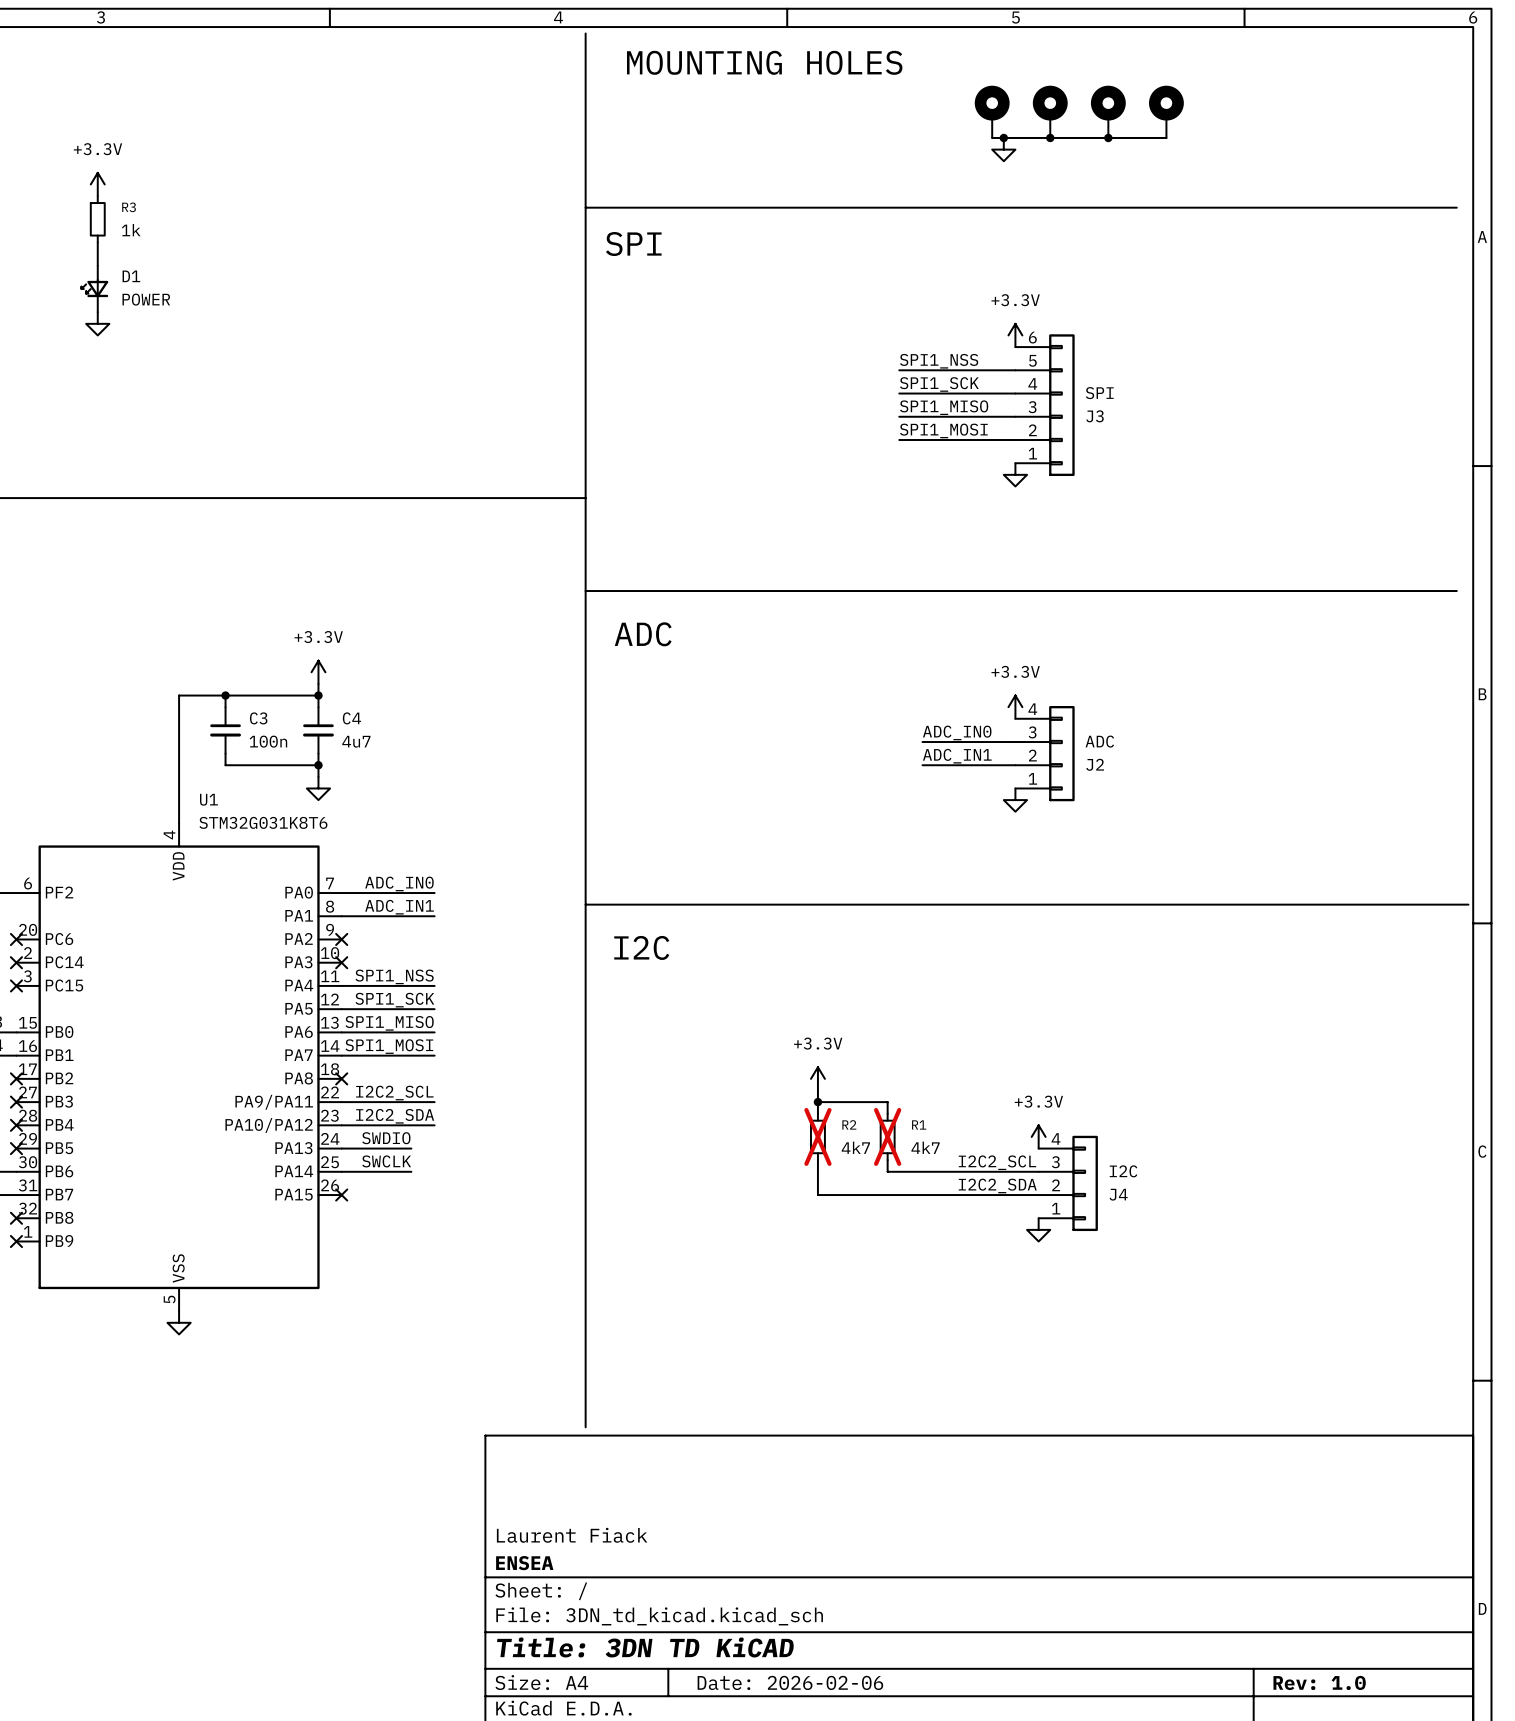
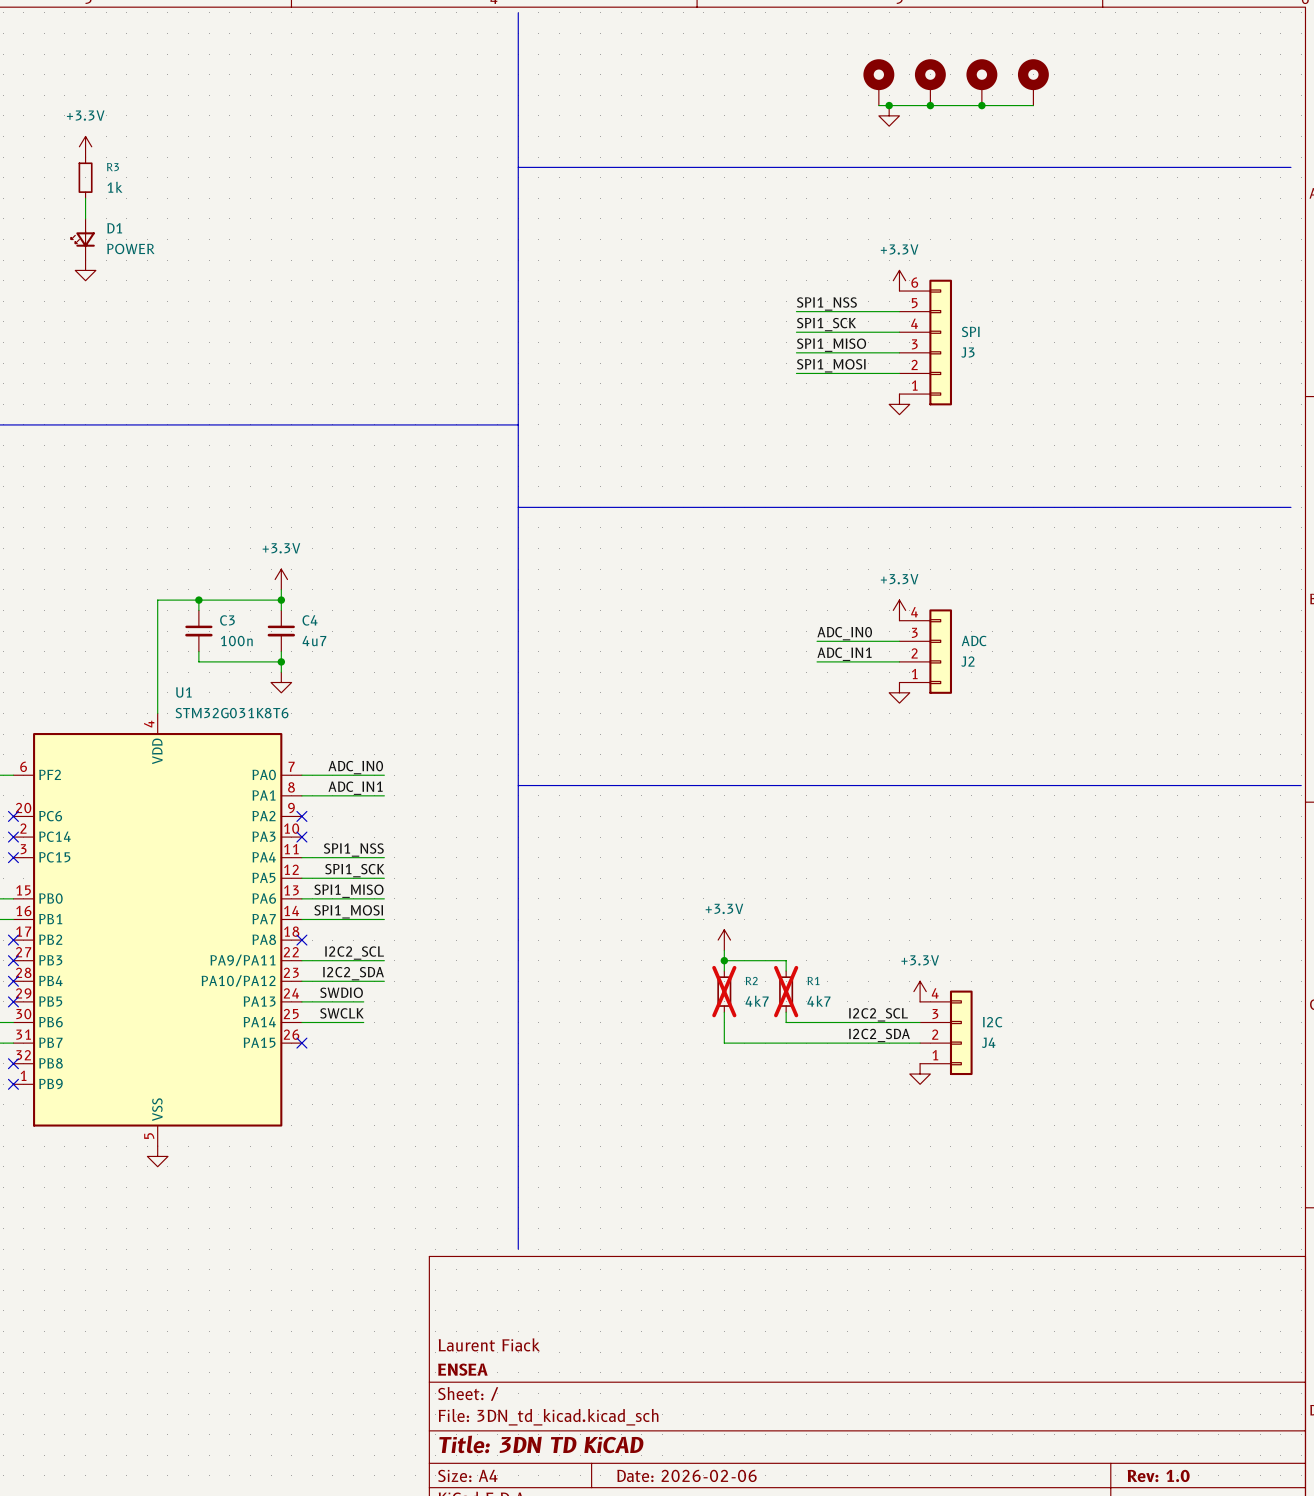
text: MOUNTING HOLES (764, 62) -> none
text: SPI (633, 244) -> none
text: ADC (643, 634) -> none
text: I2C (641, 947) -> none

